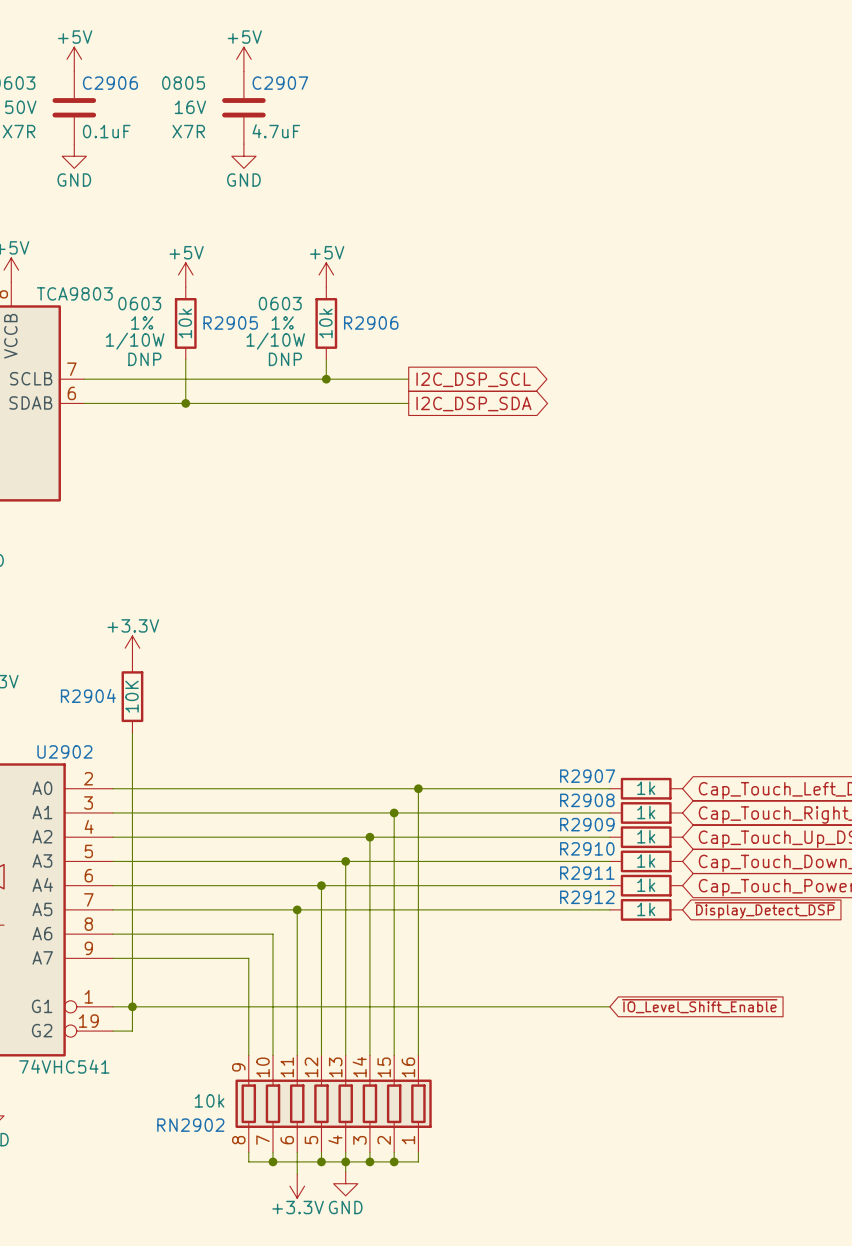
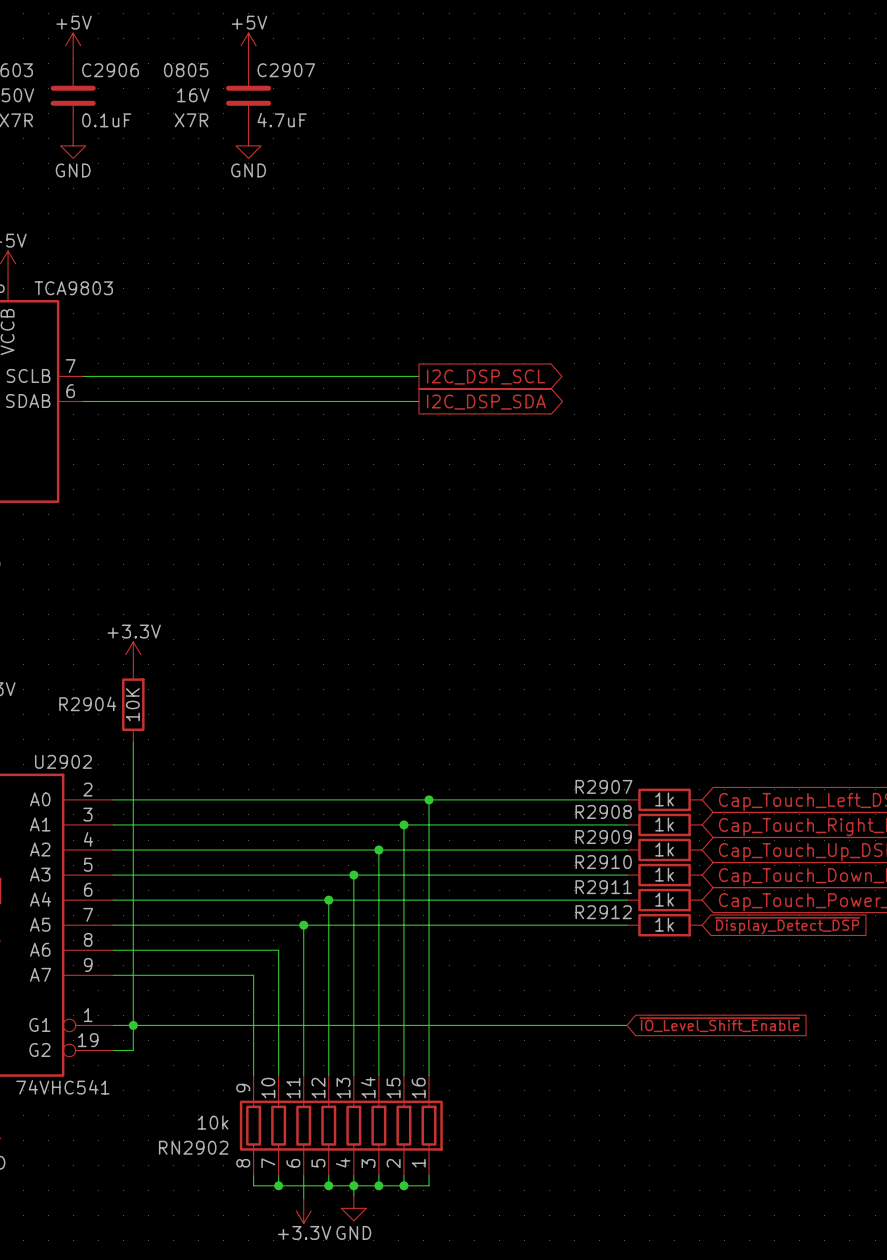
power symbol: +5V (185, 274) -> none
power symbol: +5V (326, 274) -> none
R2905: 10k (185, 323) -> none
R2906: 10k (326, 323) -> none
wire: (185, 359) (185, 403) -> none
wire: (326, 359) (326, 379) -> none
junction: (326, 379) -> none
junction: (185, 403) -> none

